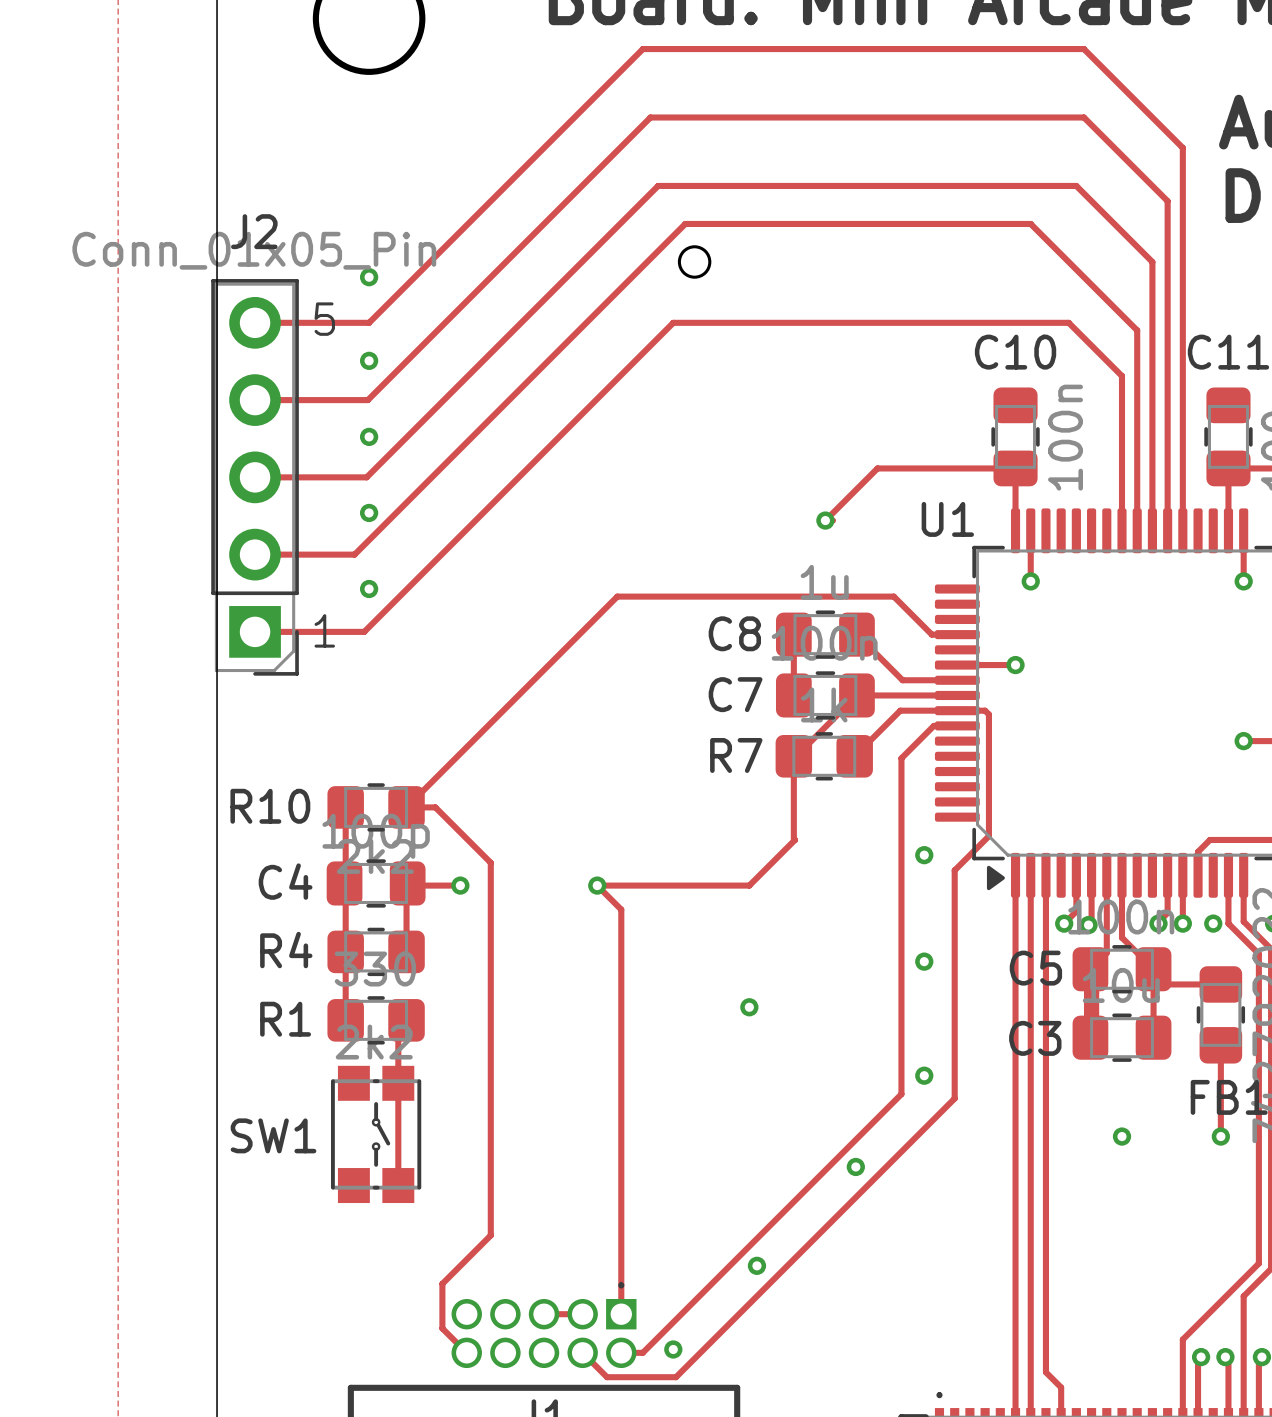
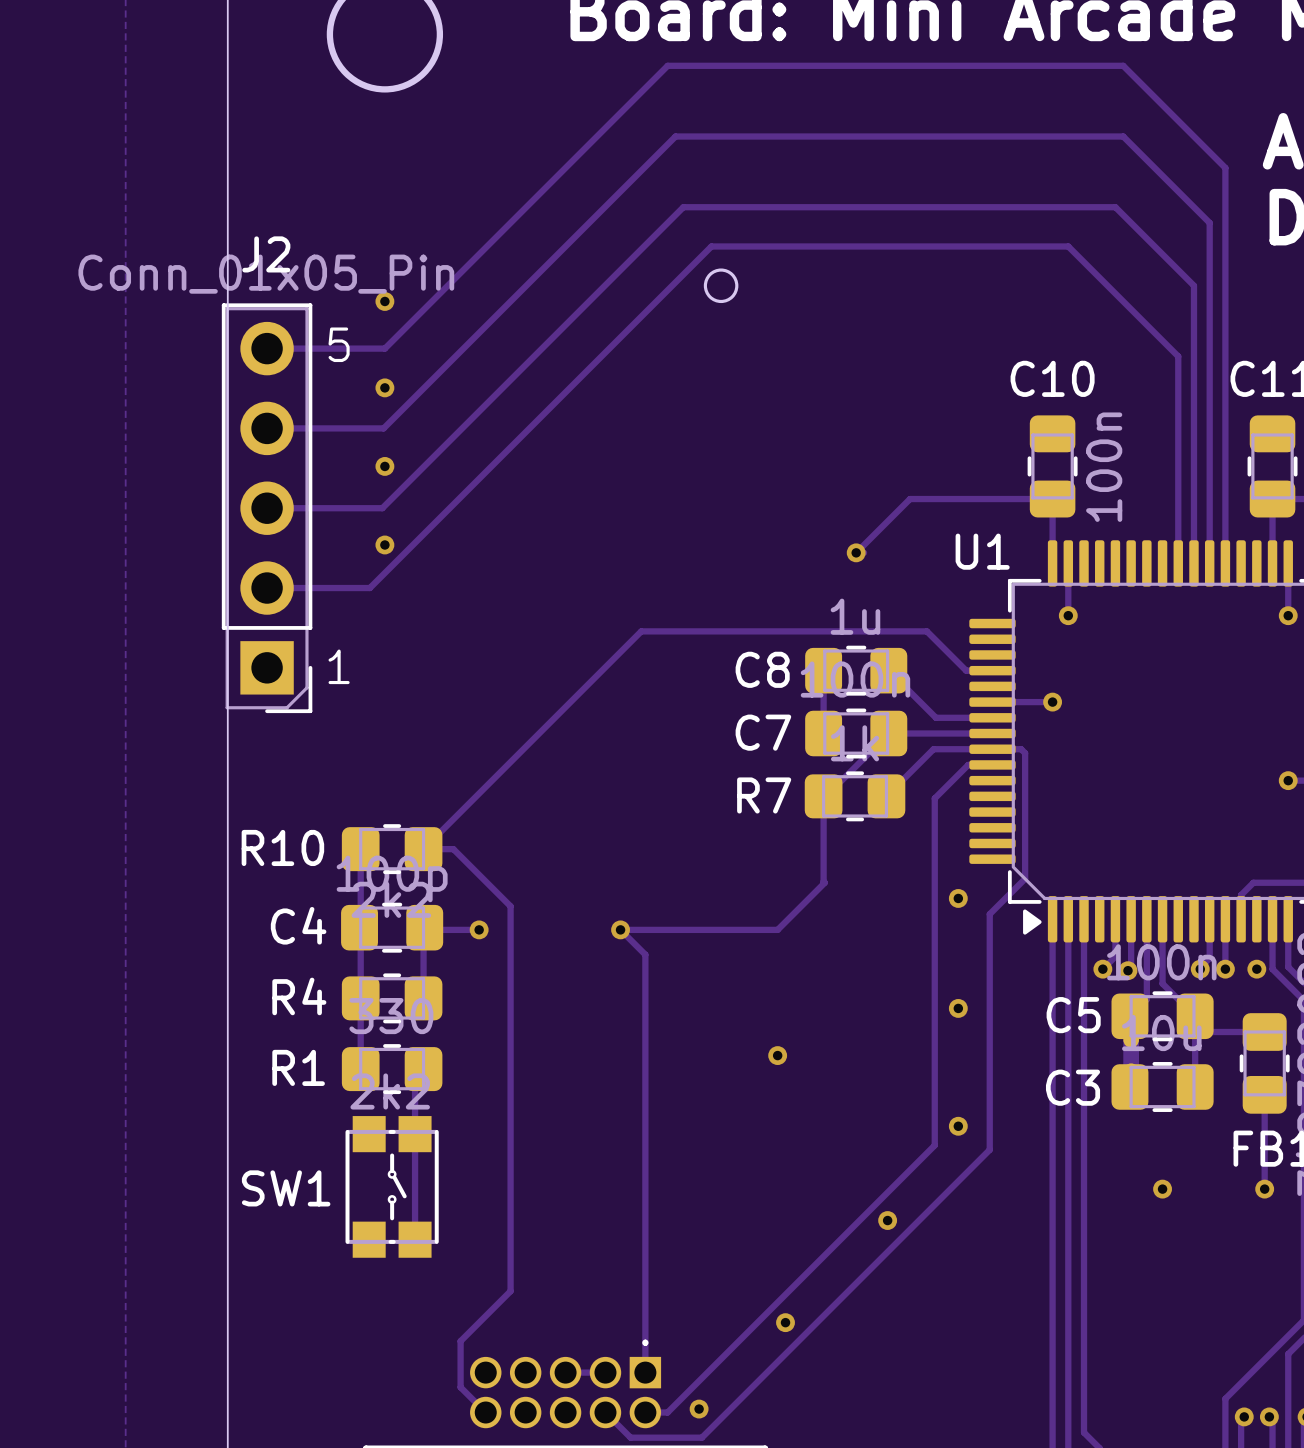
track: (1122, 530) (1122, 376) (1068, 322) (673, 322) (364, 631) (255, 631) -> none
via: (369, 589) -> none

